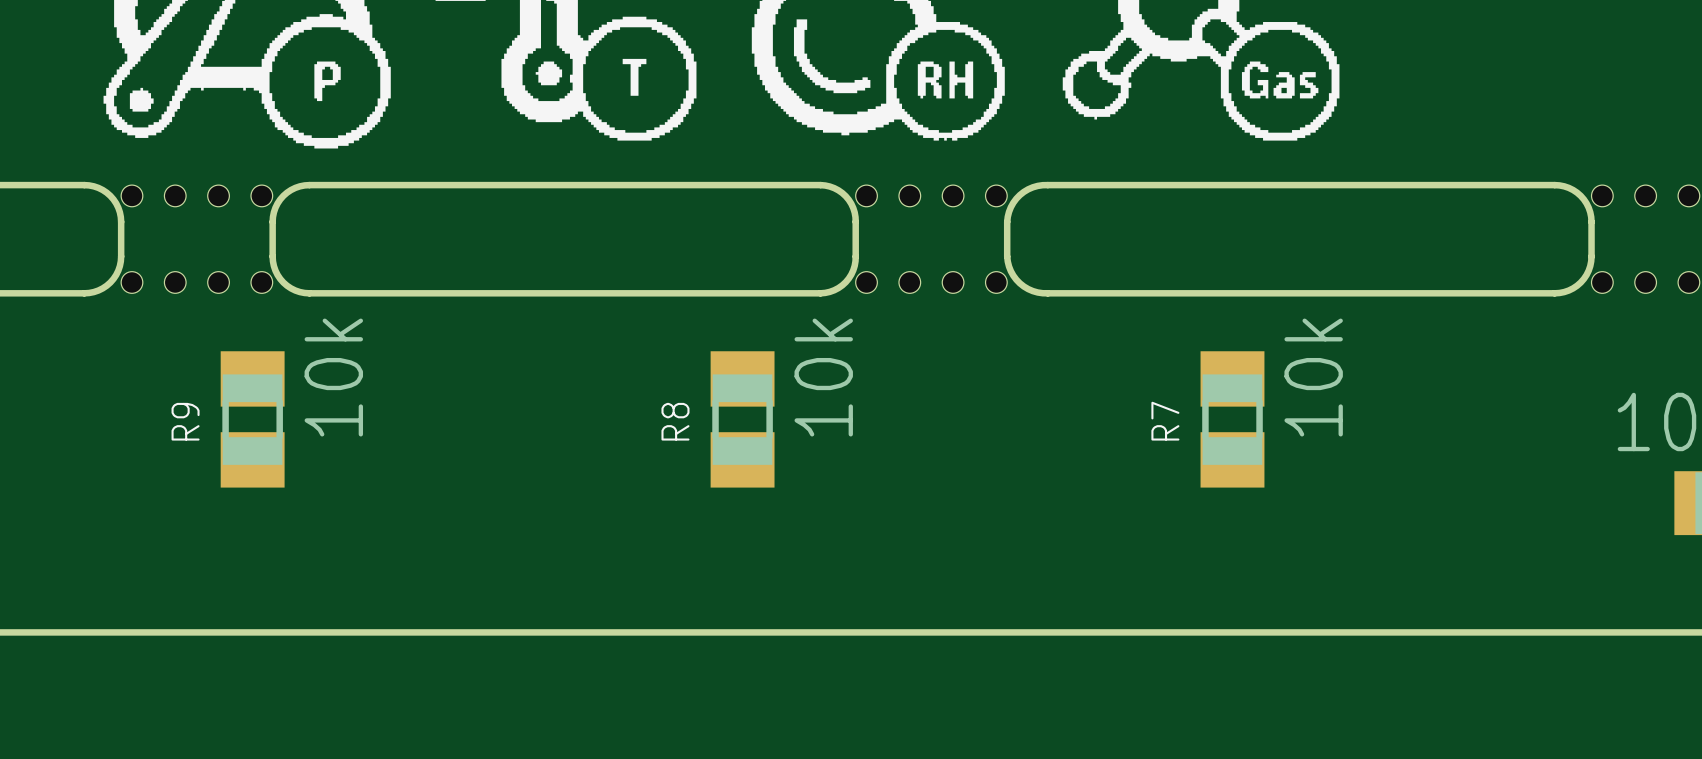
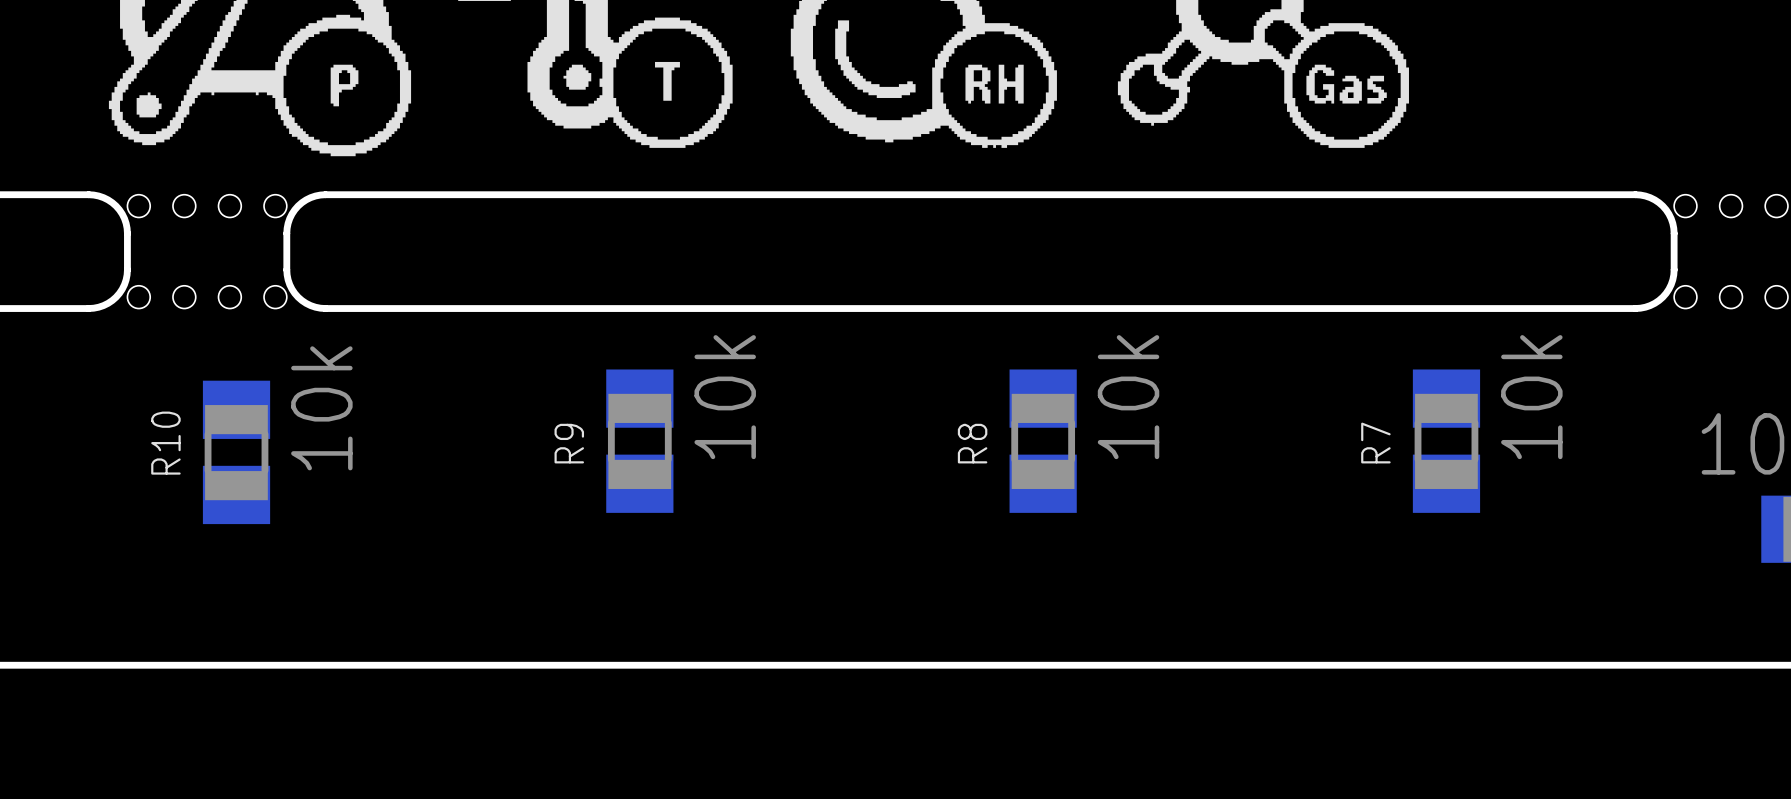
board edge: (820, 185) (834, 188) (845, 196) (853, 208) (855, 221) (855, 261) (851, 274) (838, 288) (820, 293) -> (1102, 308) (863, 308)
board edge: (1047, 185) (1032, 187) (1019, 195) (1010, 207) (1007, 221) (1007, 256) (1013, 275) (1028, 289) (1047, 293) -> (1102, 194) (863, 194)
hole: (866, 195) -> none
hole: (909, 195) -> none
hole: (953, 195) -> none
hole: (996, 195) -> none
hole: (866, 282) -> none
hole: (909, 282) -> none
hole: (953, 282) -> none
hole: (996, 282) -> none
R9 position: (252, 419) -> (639, 441)
R8 position: (742, 419) -> (1043, 441)
R7 position: (1232, 419) -> (1446, 441)
R10: none -> 10k (236, 452)

